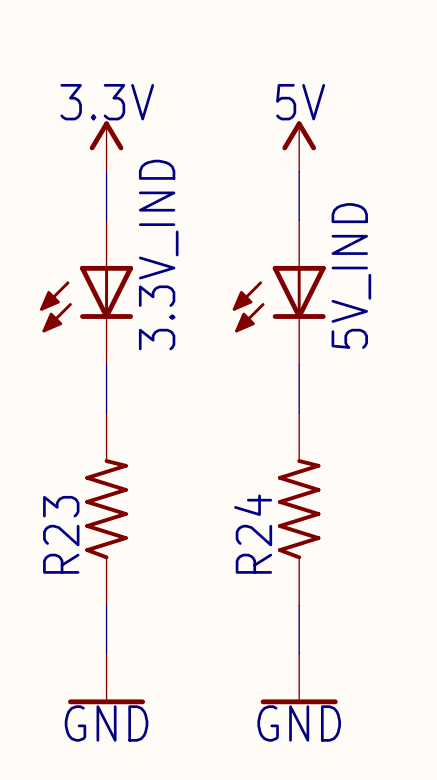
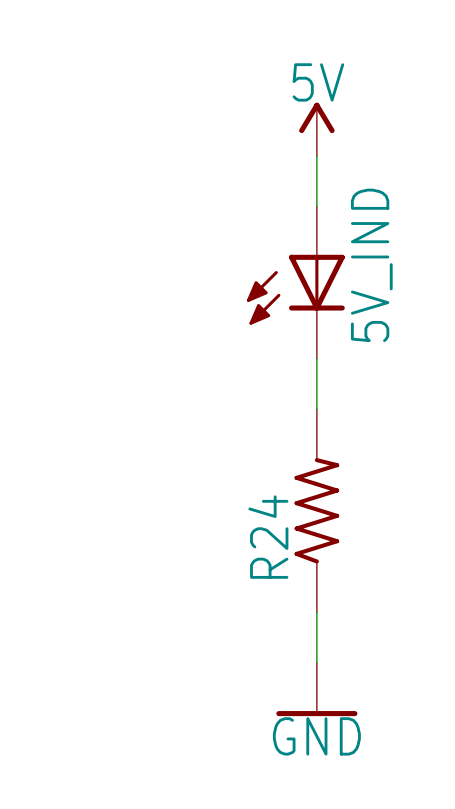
power symbol: 3.3V (106, 146) -> none
wire: (106, 172) (106, 220) -> none
3.3V_IND: (86, 292) -> none
wire: (106, 364) (106, 412) -> none
R23: (106, 509) -> none
wire: (106, 605) (106, 653) -> none
power symbol: GND (106, 678) -> none

